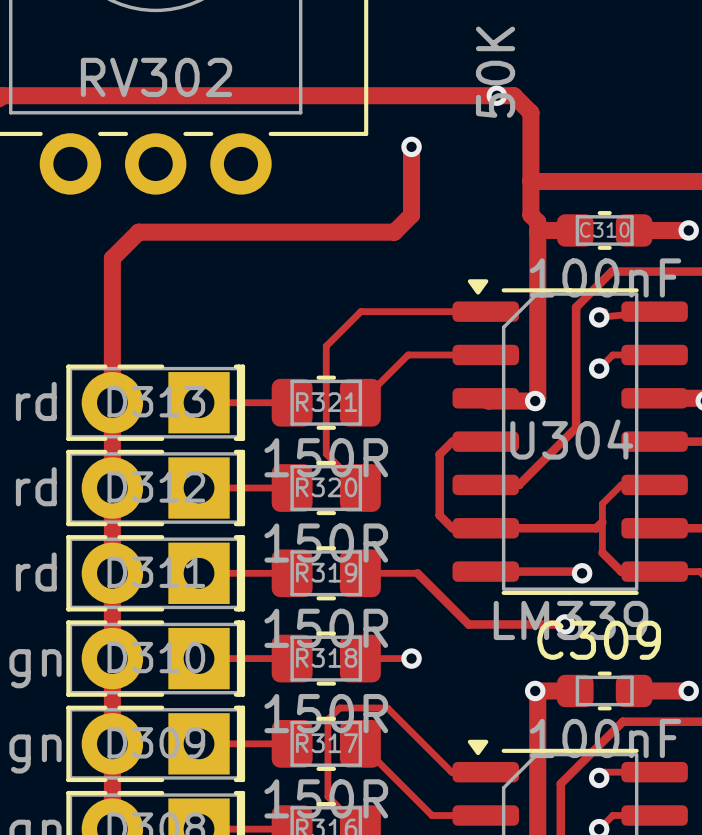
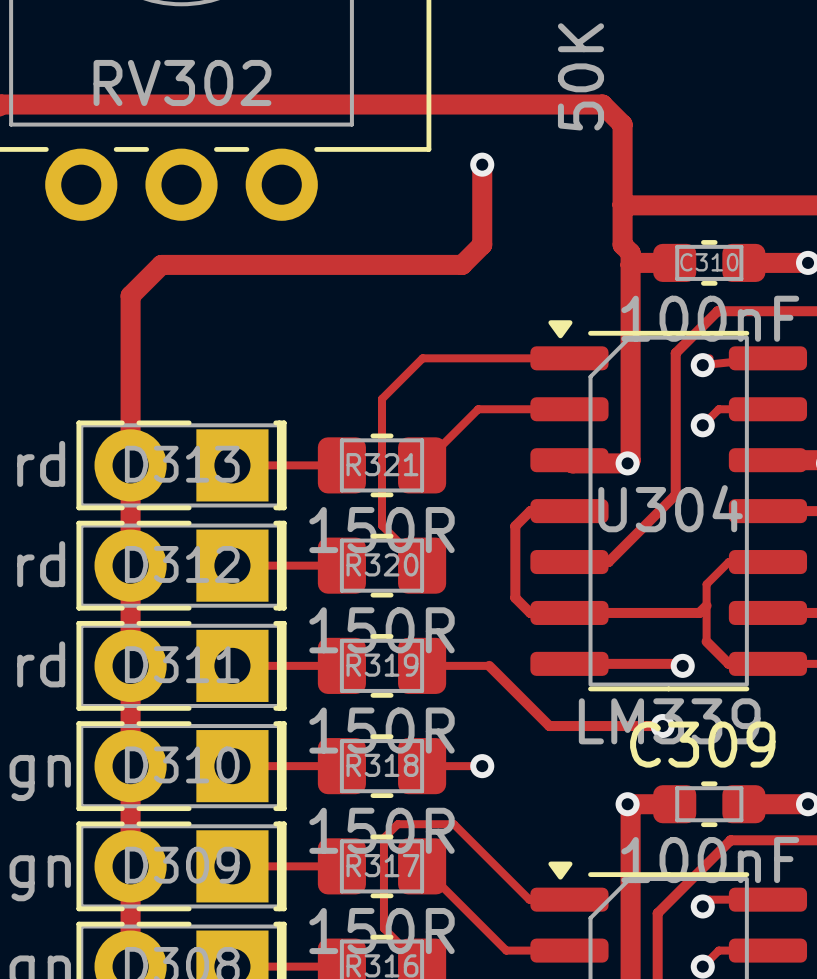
via: (496, 95) -> none

